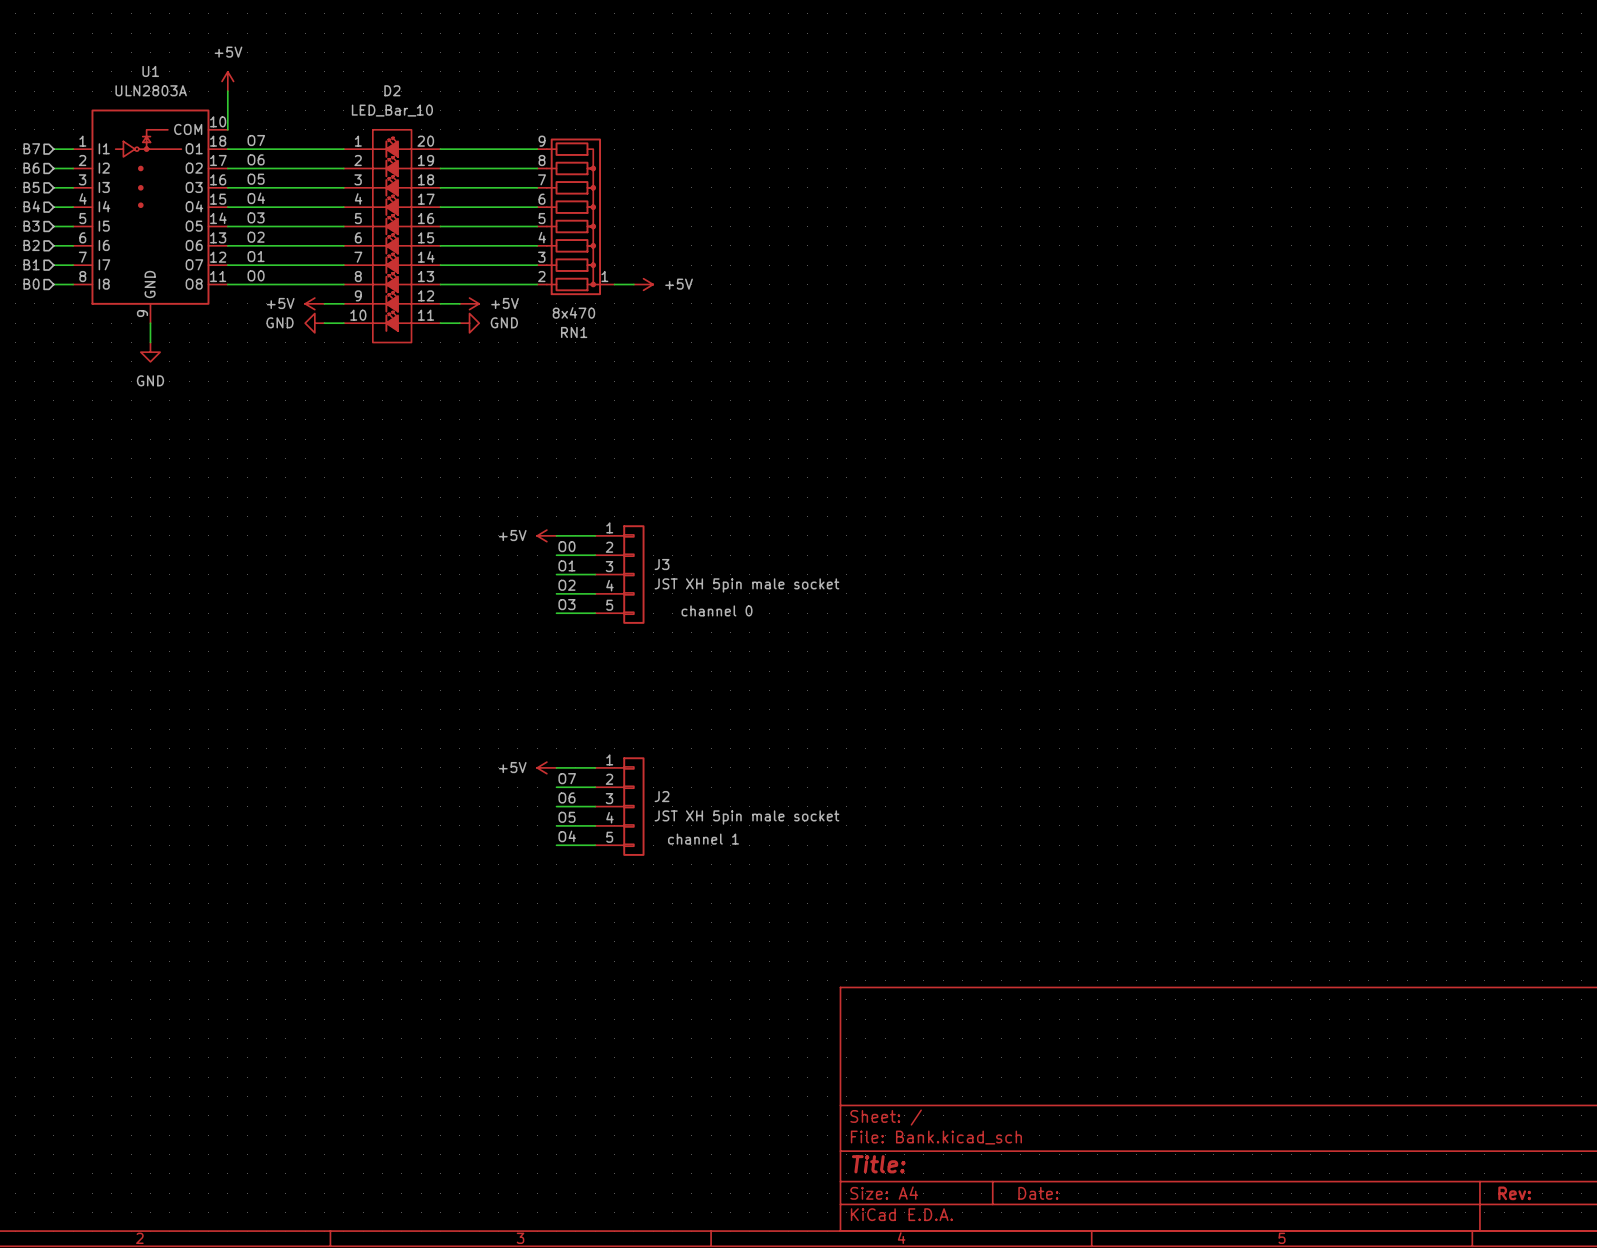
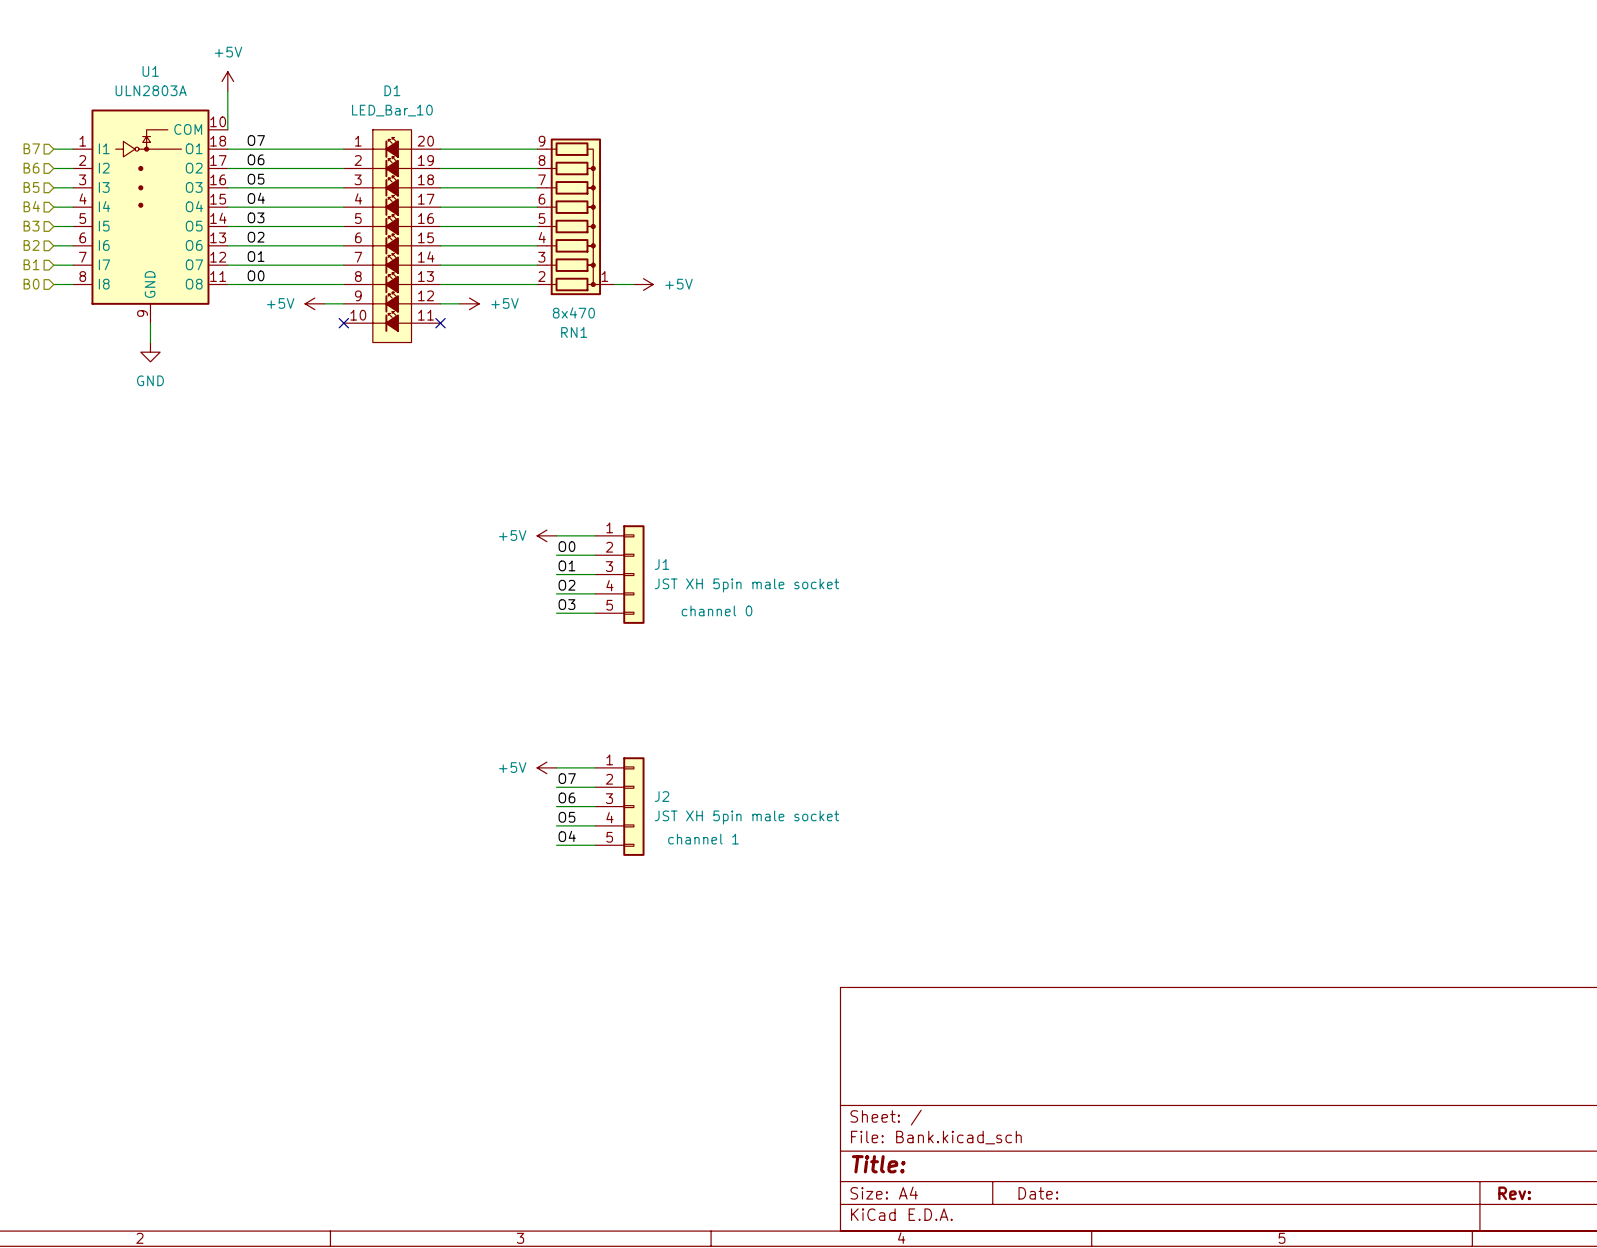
D2 name: D2 (392, 90) -> D1 (392, 90)
power symbol: GND (314, 323) -> none
wire: (324, 323) (343, 323) -> none
no-connect mark: none -> (343, 323)
wire: (440, 323) (459, 323) -> none
no-connect mark: none -> (440, 323)
power symbol: GND (469, 323) -> none
J3 name: J3 (662, 564) -> J1 (662, 564)

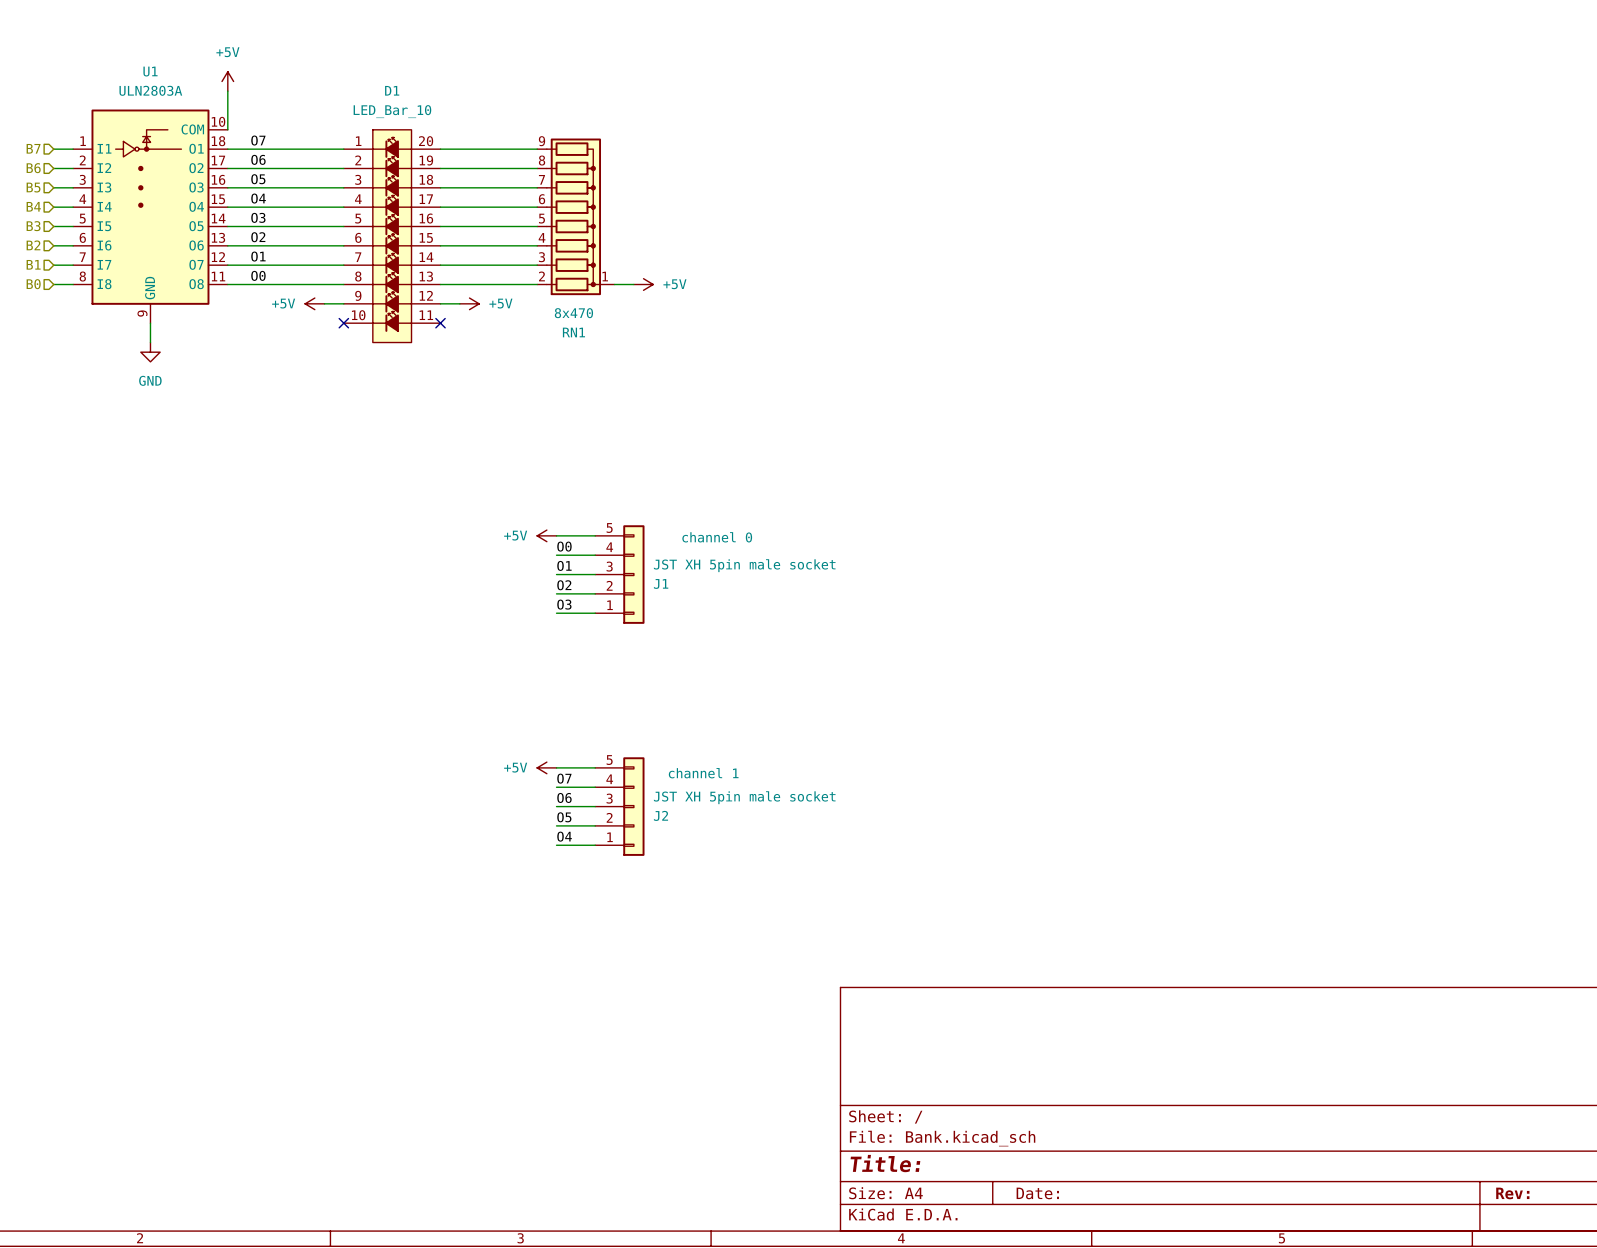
J1 flip: as is (633, 574) -> up-down (633, 574)
J2 flip: as is (633, 806) -> up-down (633, 806)

